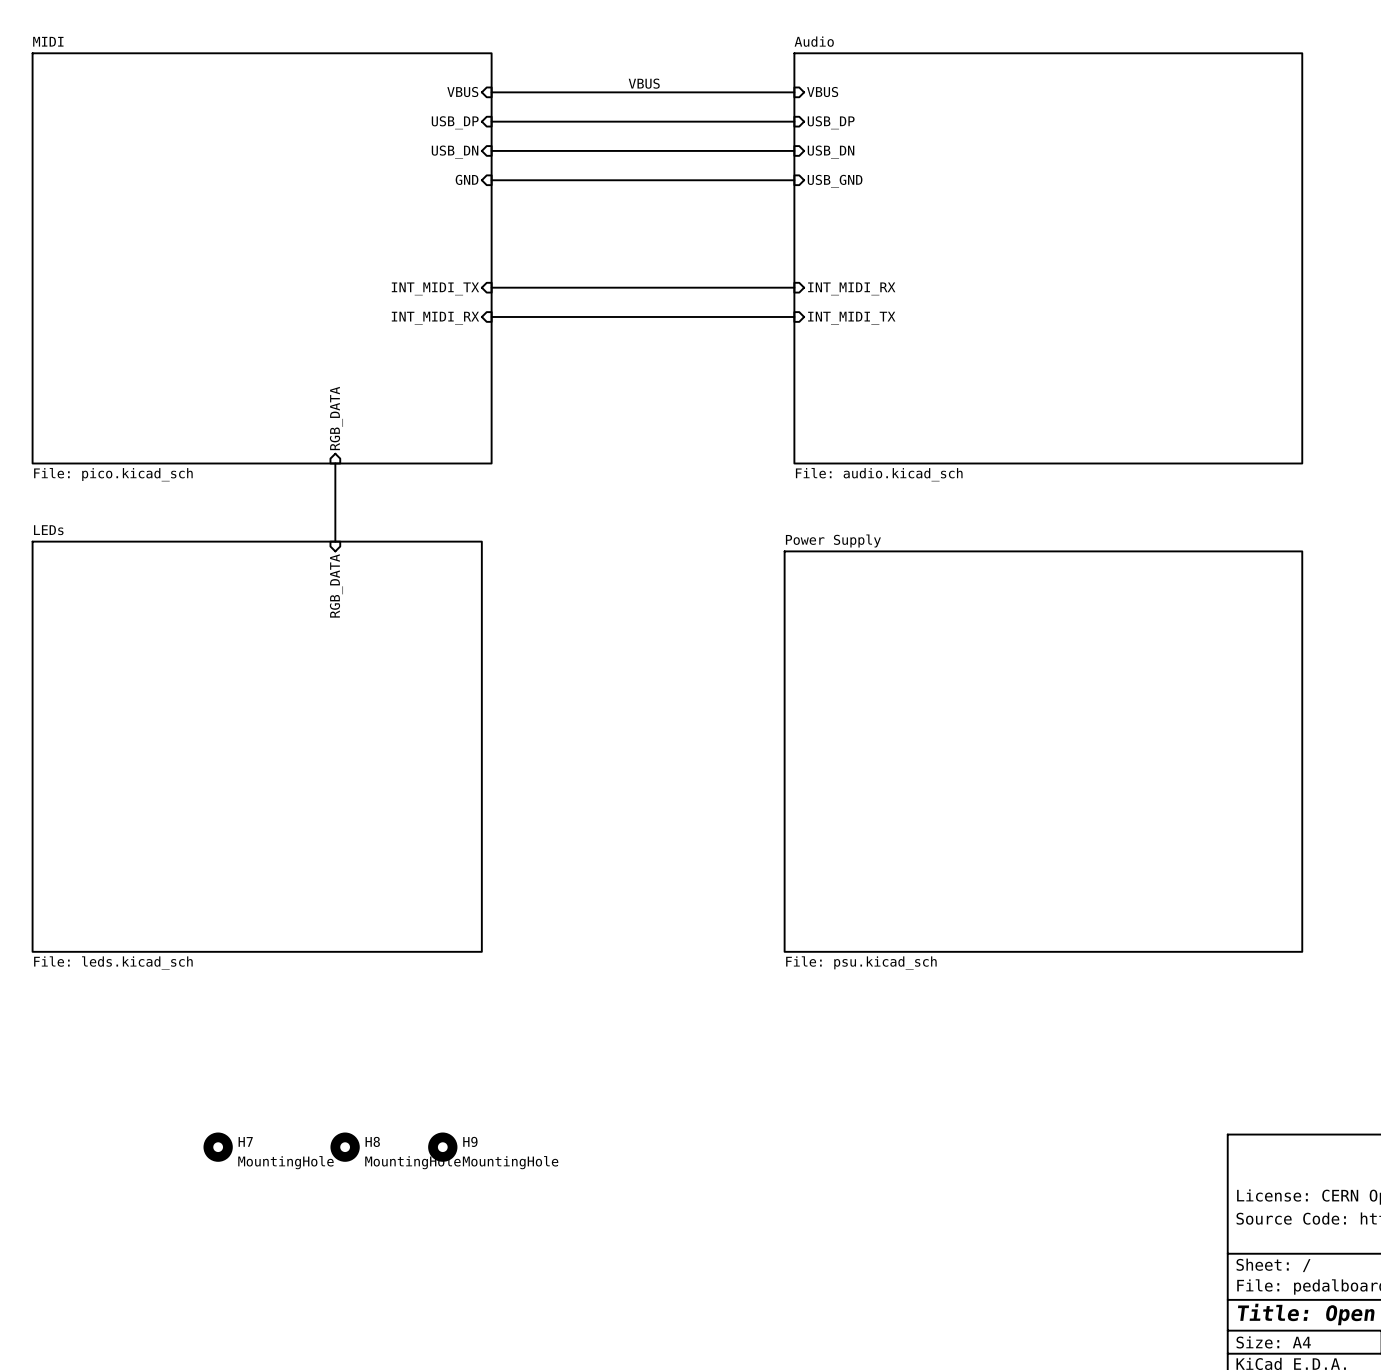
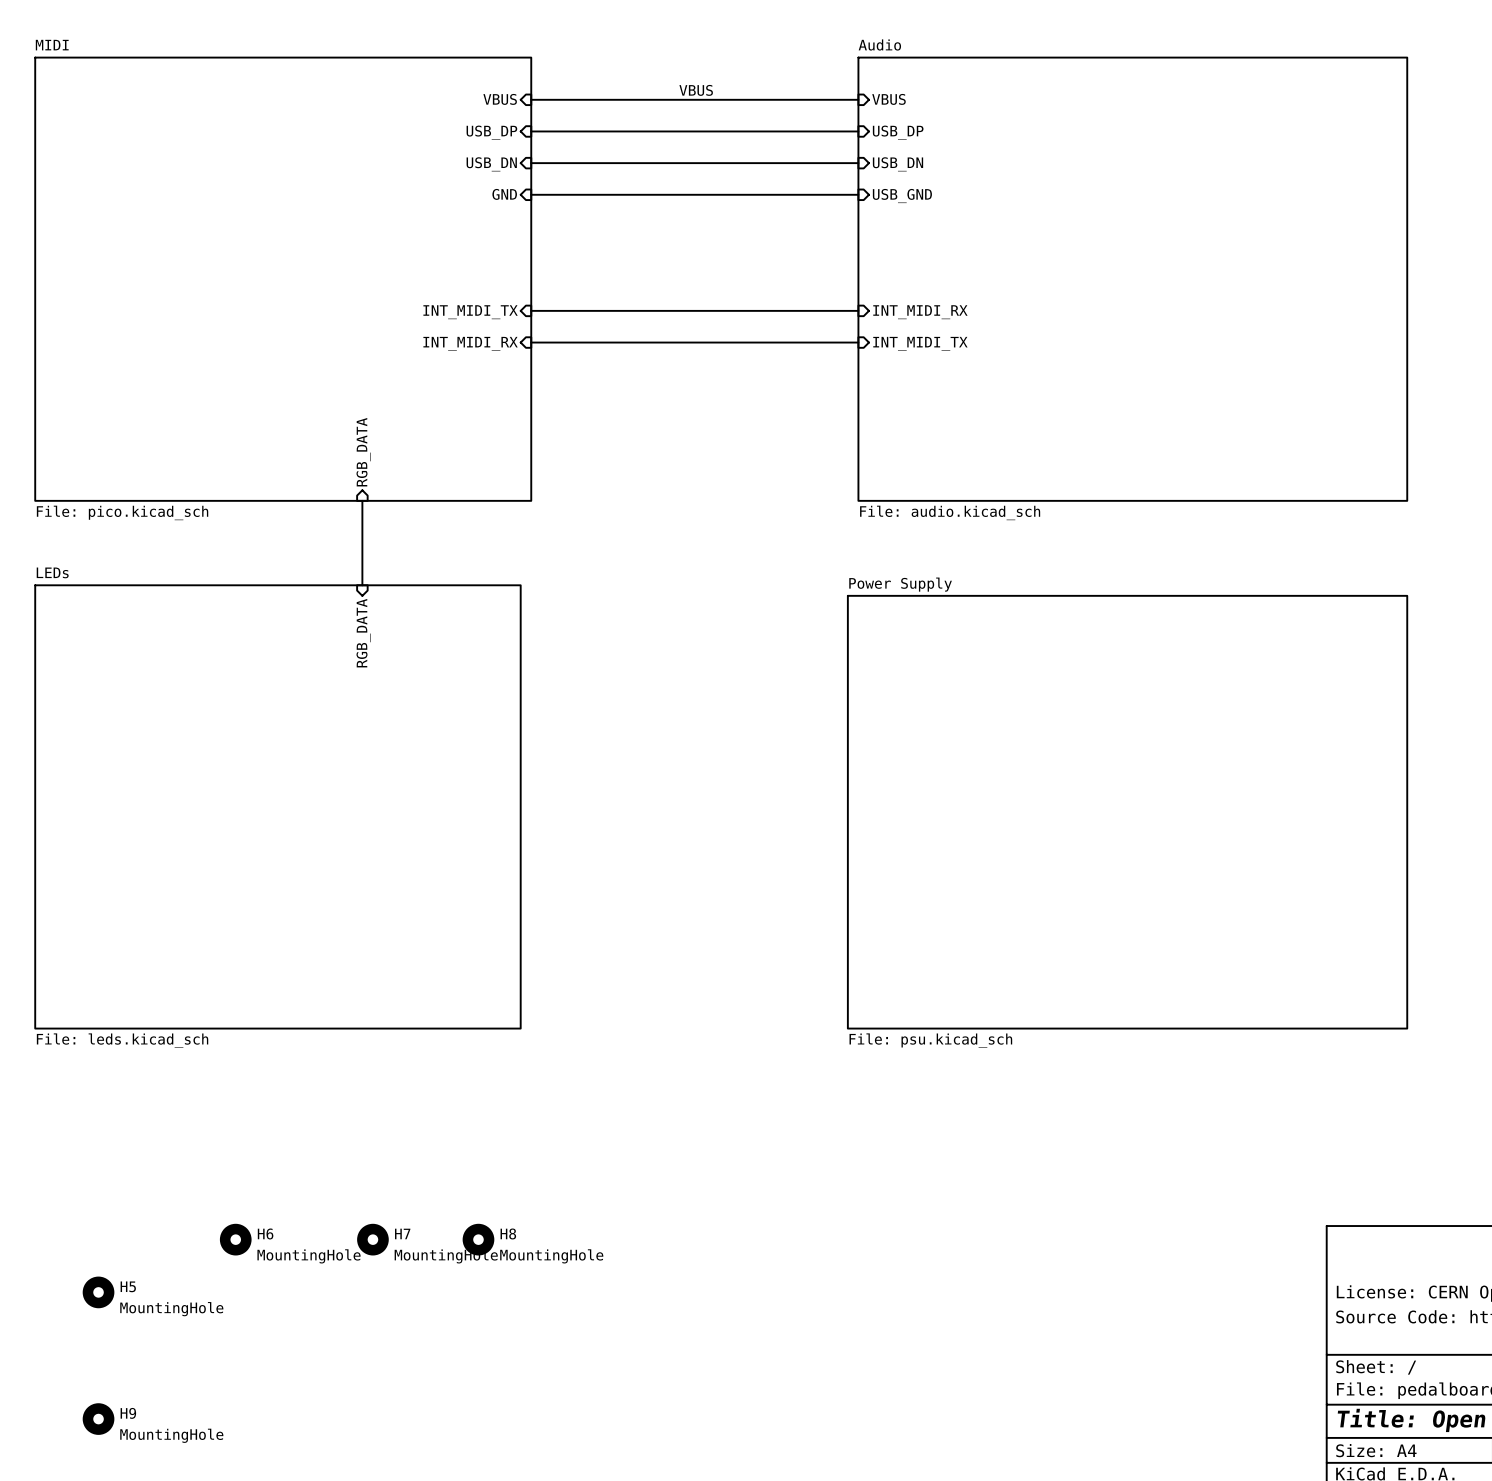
H7 name: H7 (245, 1141) -> H6 (265, 1233)
H8 name: H8 (372, 1141) -> H7 (402, 1233)
H9 name: H9 (470, 1141) -> H8 (508, 1233)
H5: none -> MountingHole (98, 1292)
H9: none -> MountingHole (98, 1419)

